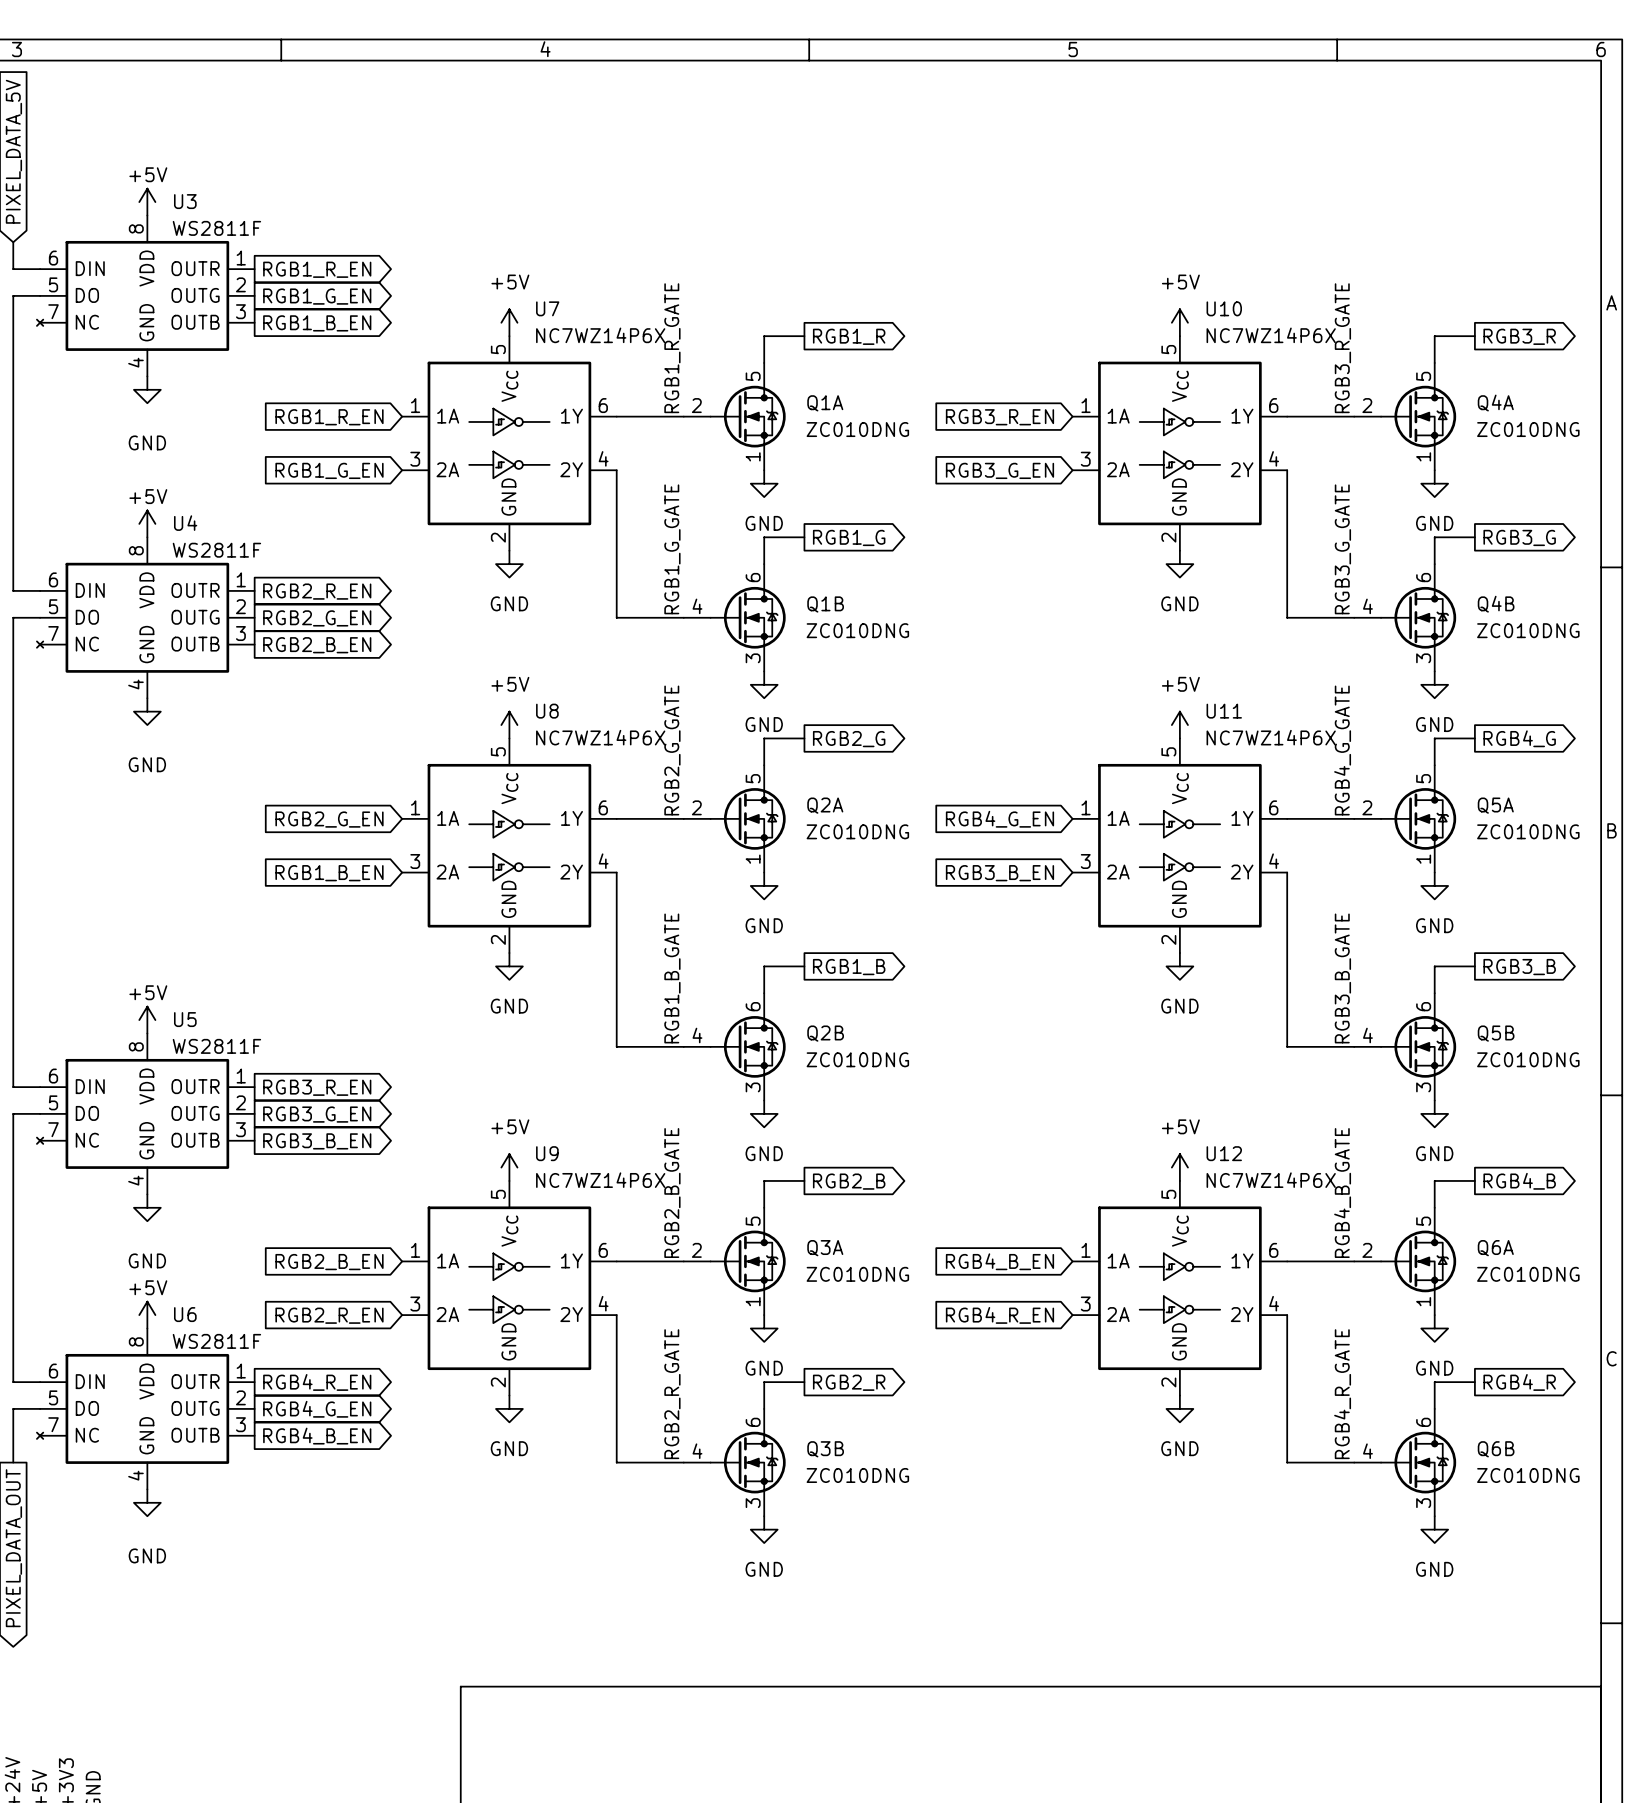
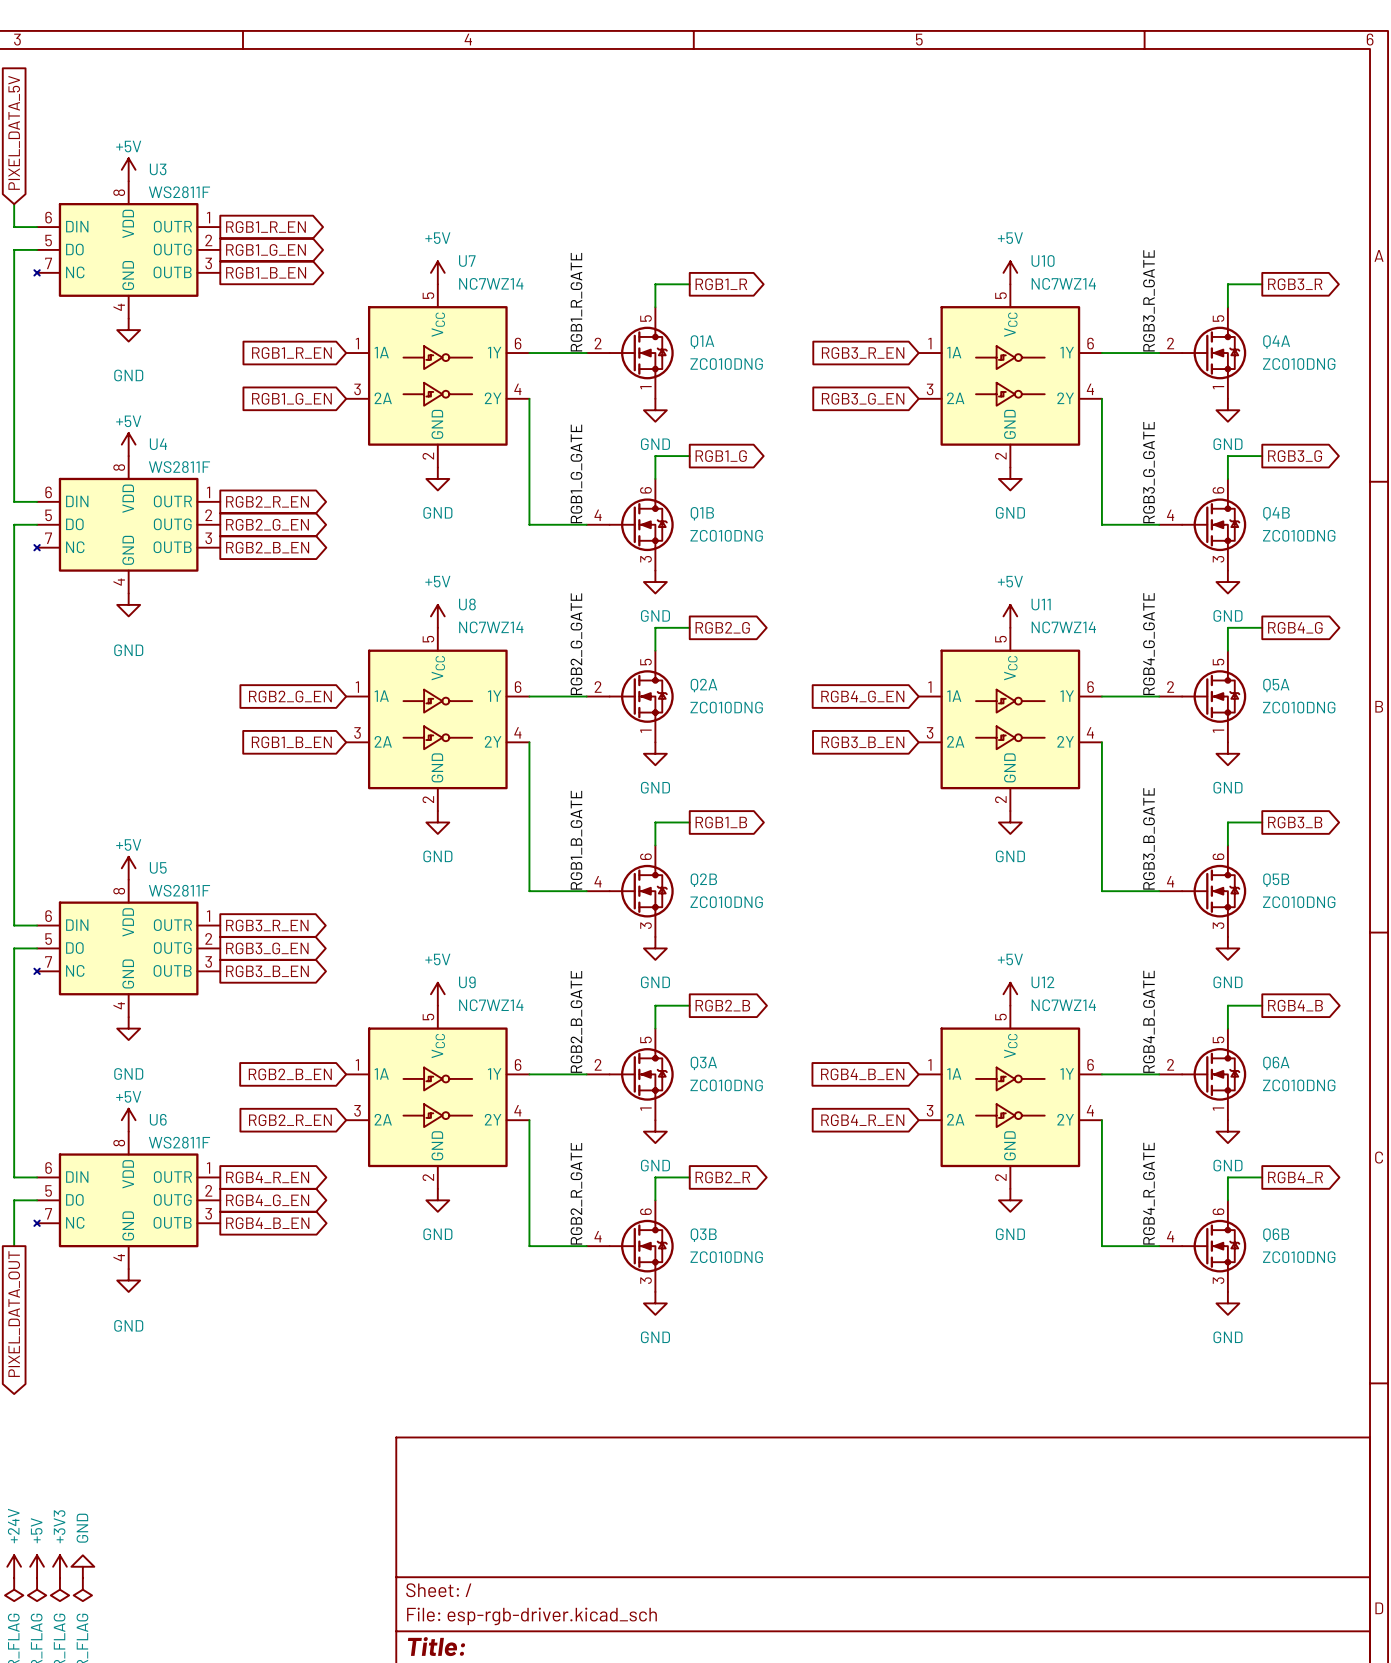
U7 value: NC7WZ14P6X (600, 335) -> NC7WZ14 (491, 283)
U10 value: NC7WZ14P6X (1271, 335) -> NC7WZ14 (1063, 283)
U8 value: NC7WZ14P6X (600, 737) -> NC7WZ14 (491, 627)
U11 value: NC7WZ14P6X (1271, 737) -> NC7WZ14 (1063, 627)
U9 value: NC7WZ14P6X (600, 1180) -> NC7WZ14 (491, 1005)
U12 value: NC7WZ14P6X (1271, 1180) -> NC7WZ14 (1063, 1005)

